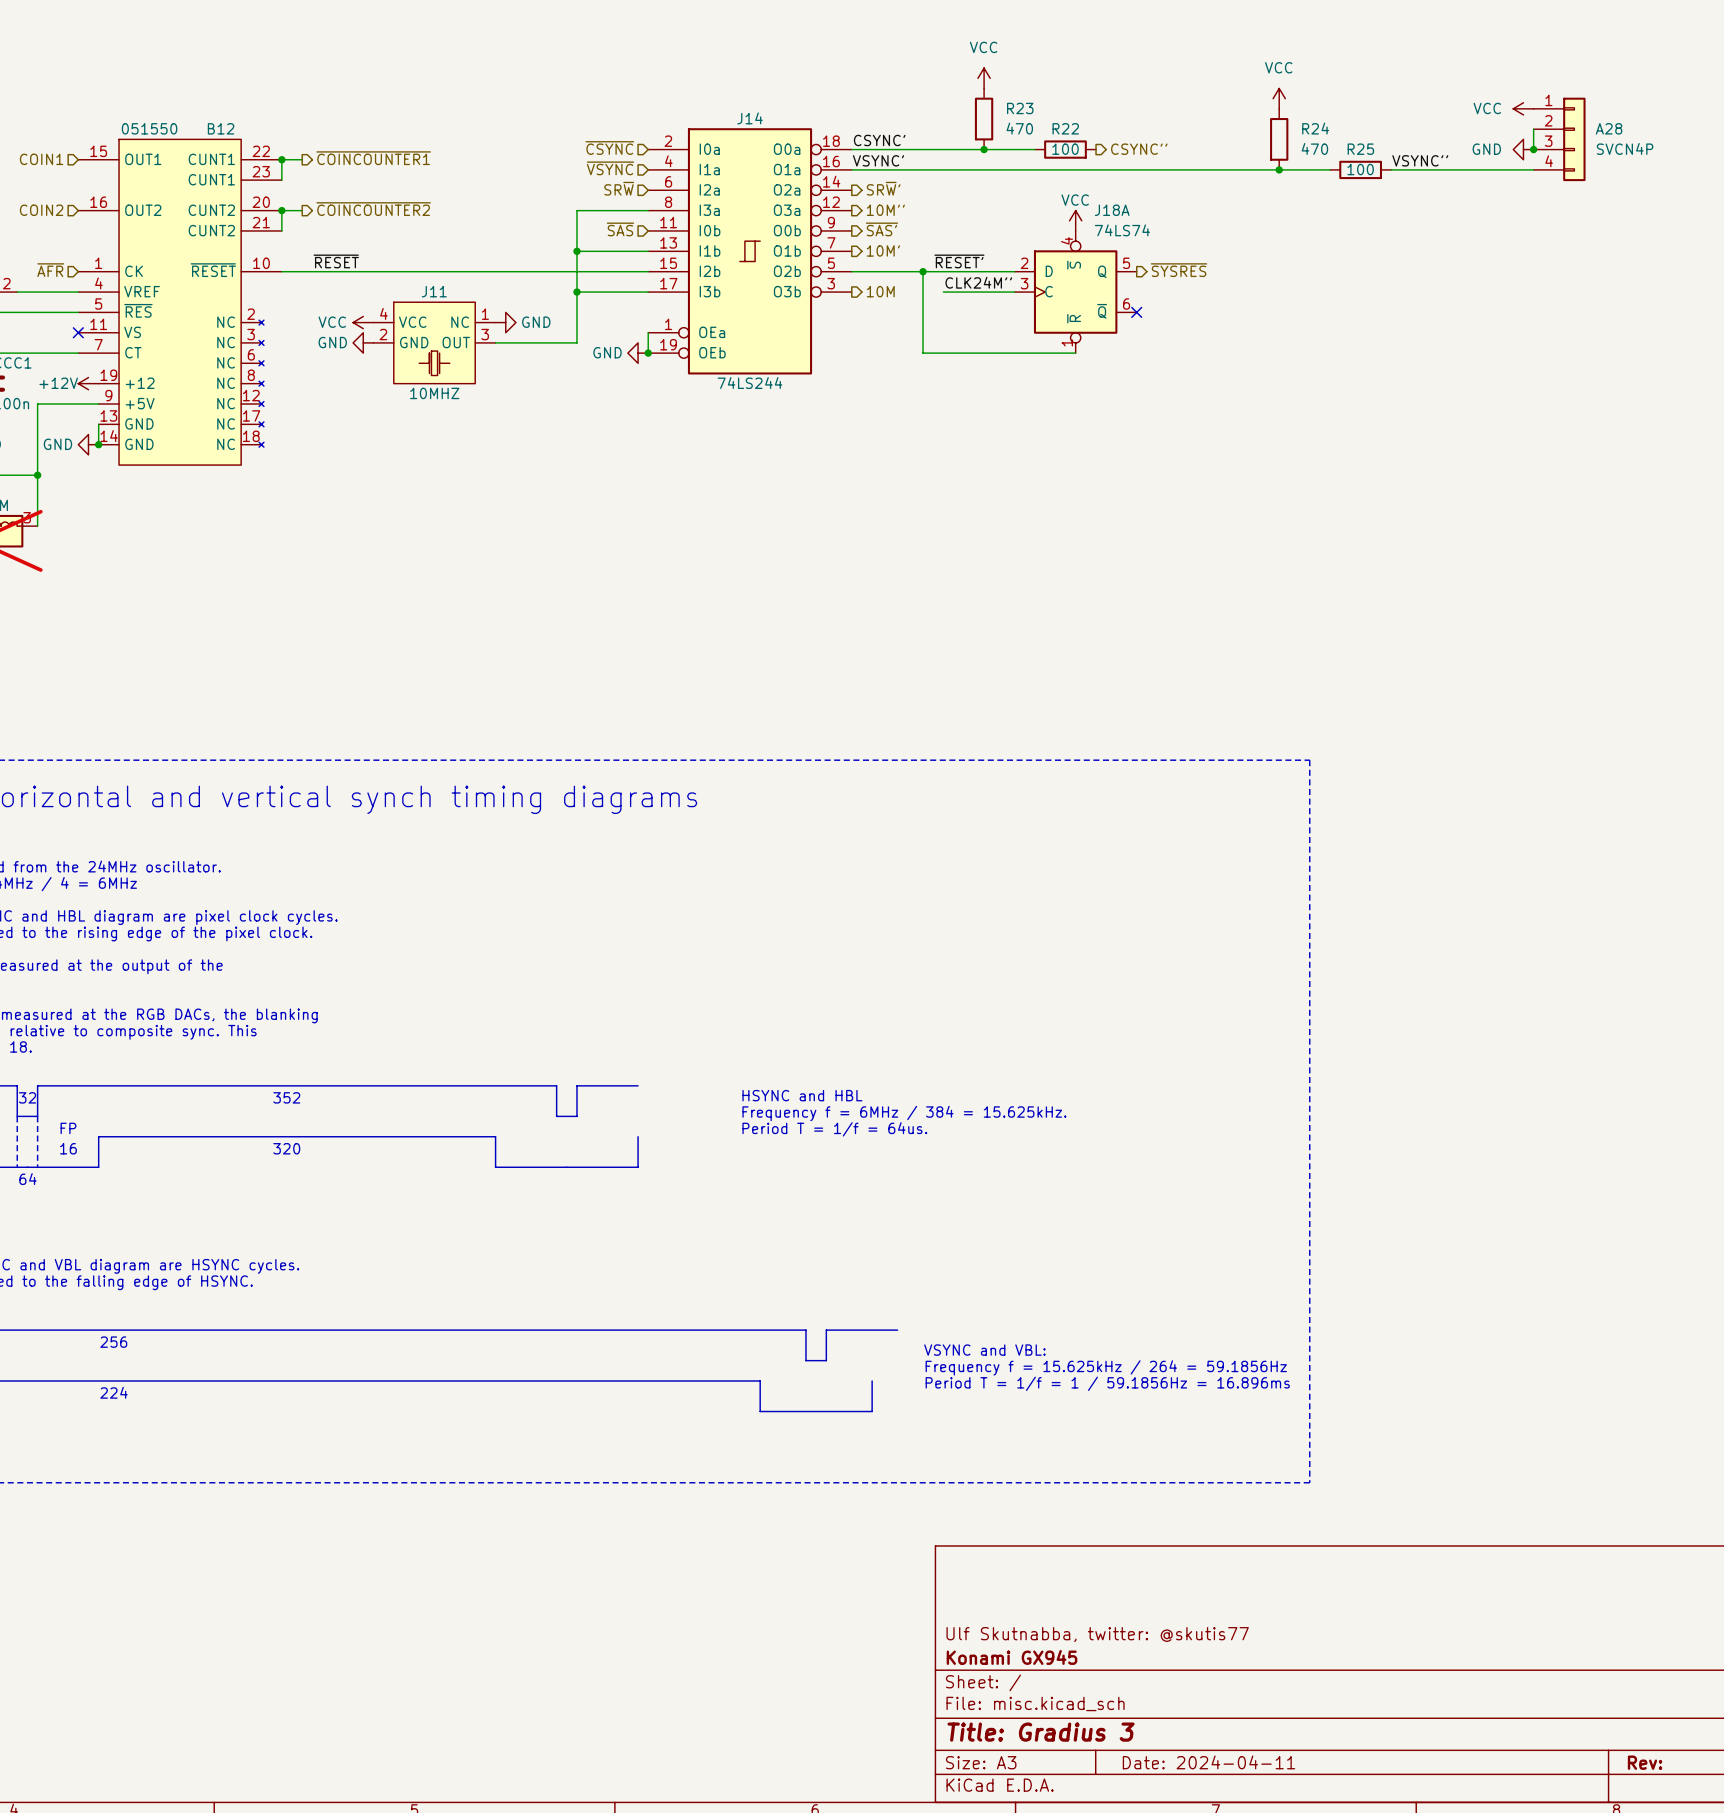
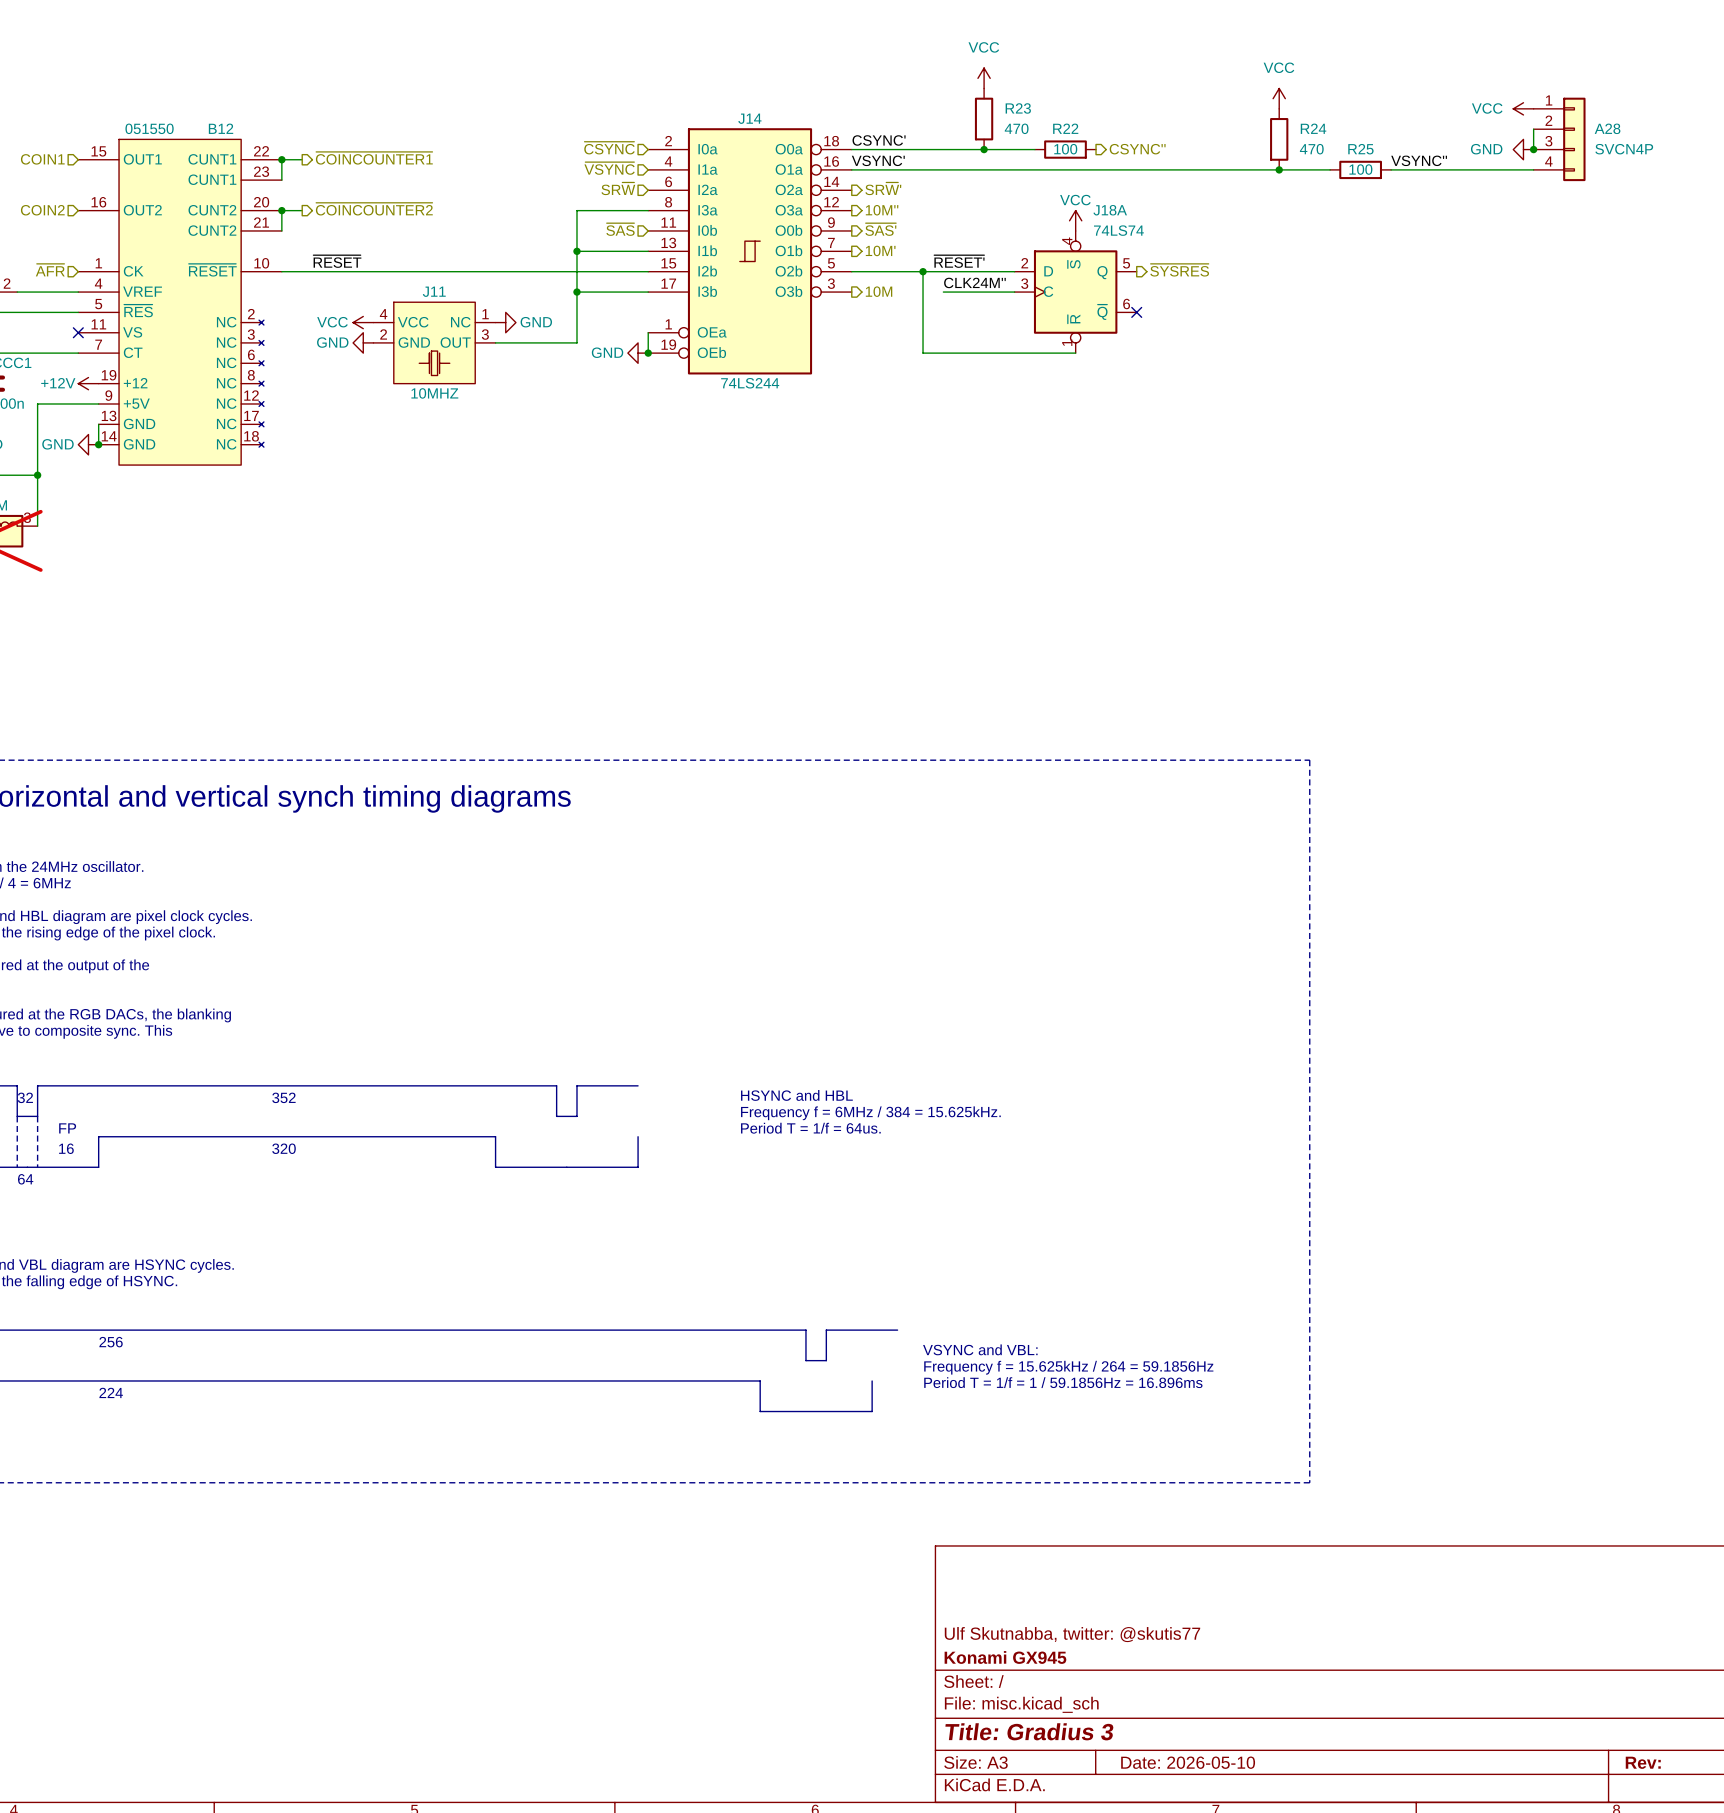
title block: Date: 2024-04-11 (1208, 1762) -> Date: 2026-05-10 (1188, 1762)

